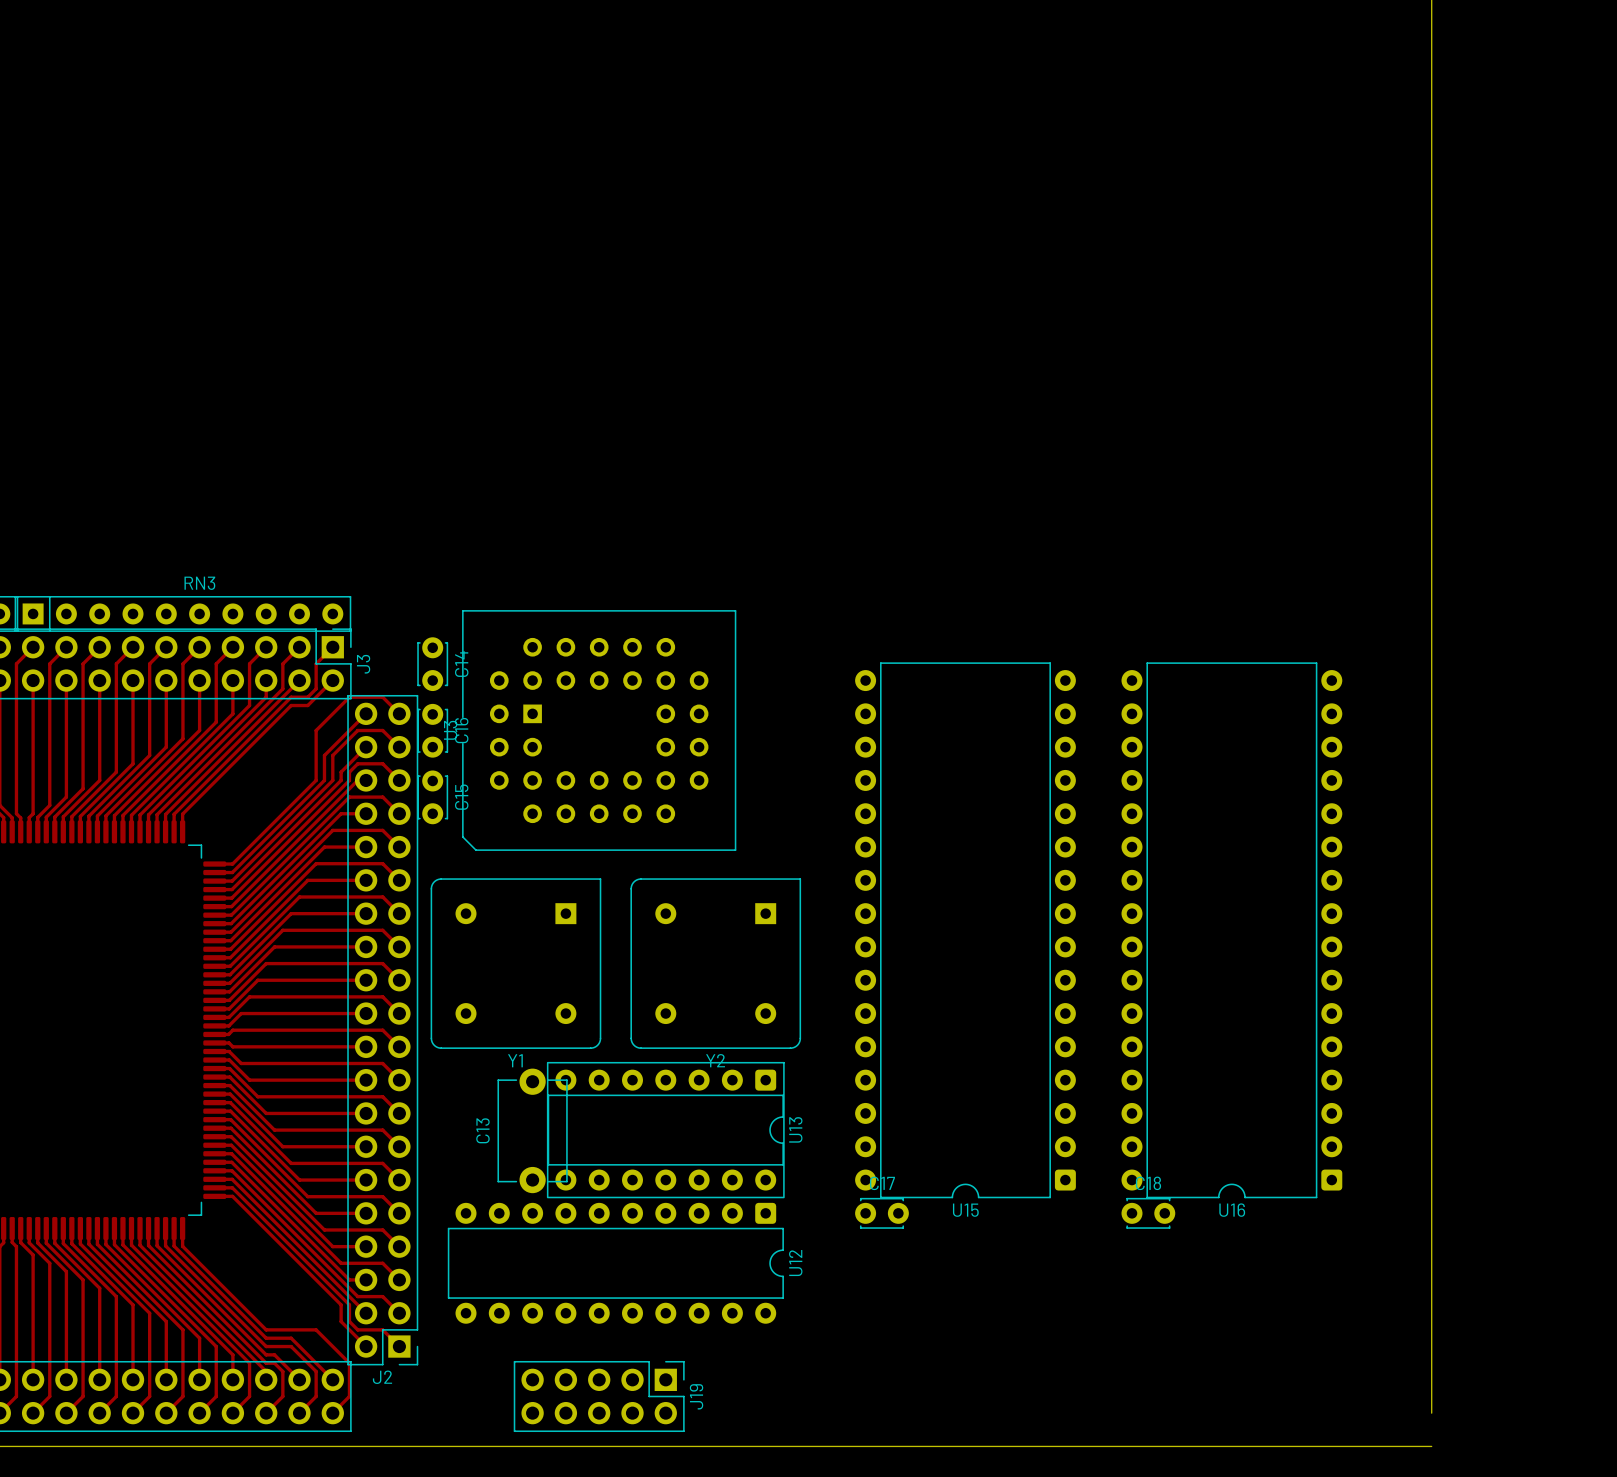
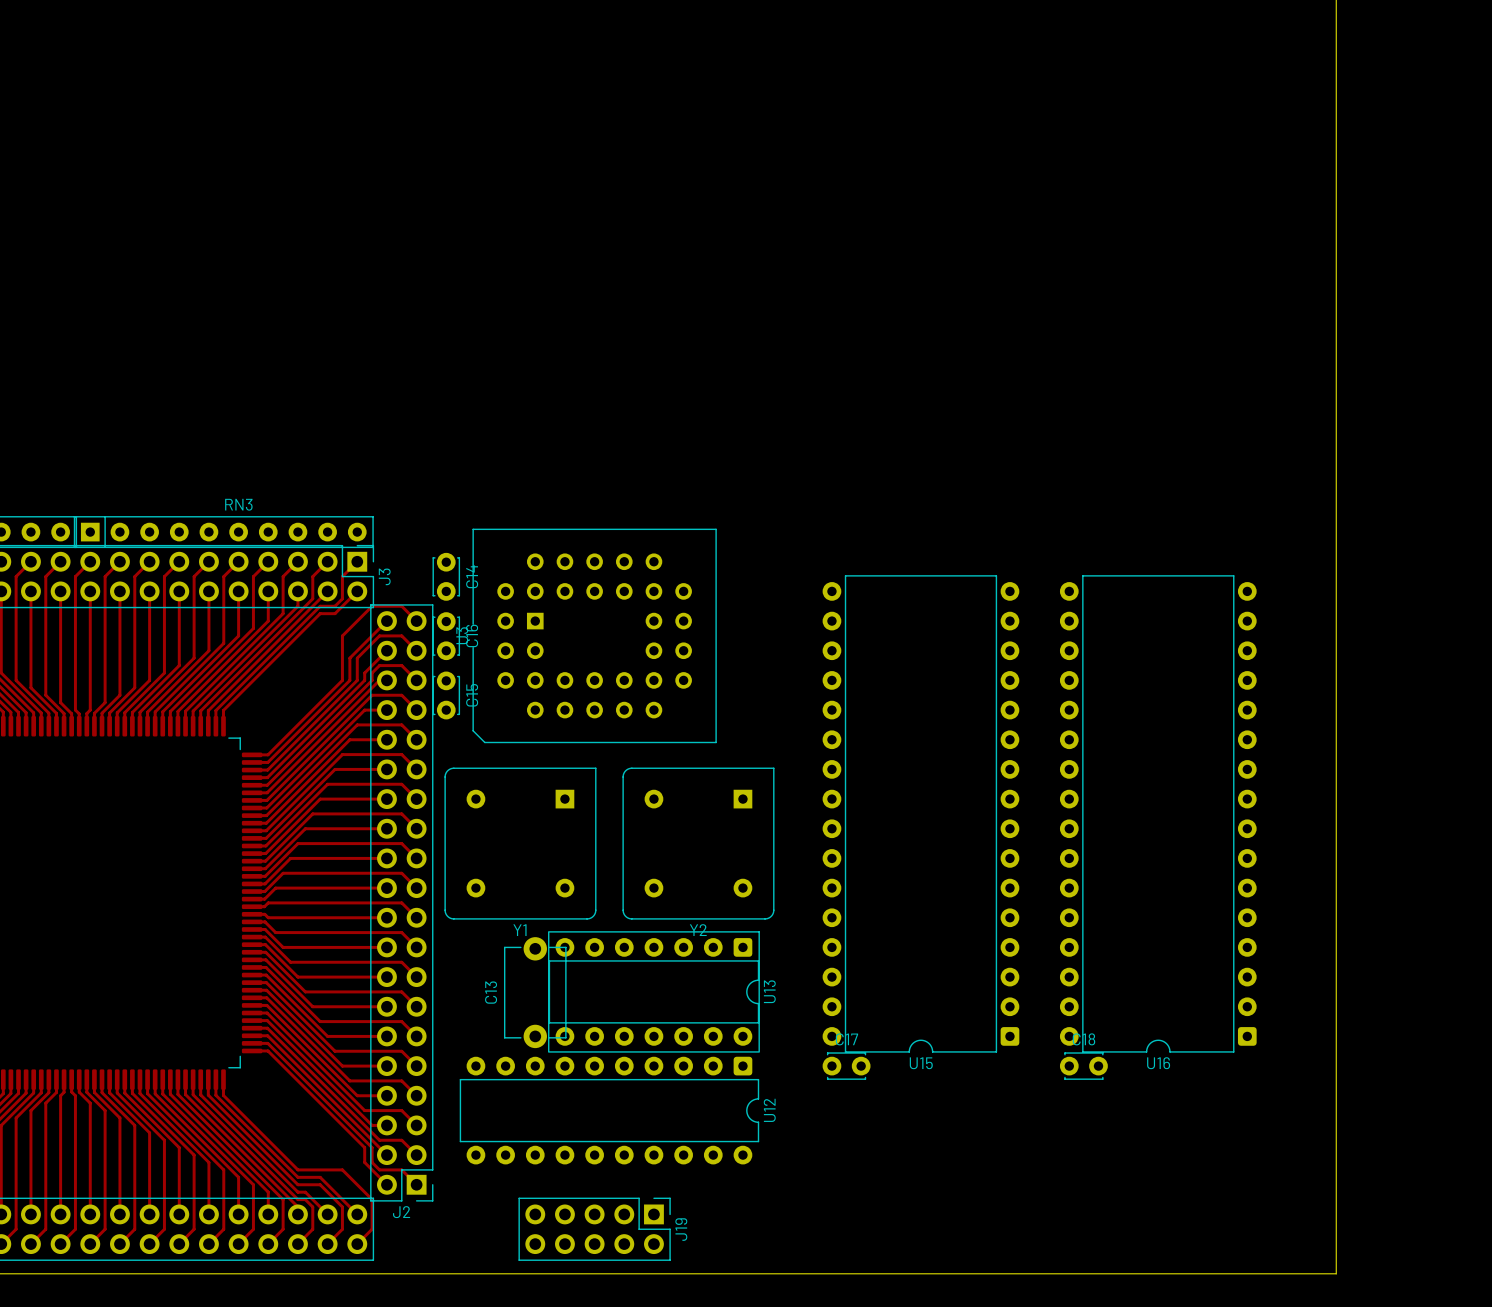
board edge: none -> (1336, 1244) (1336, 1273)

